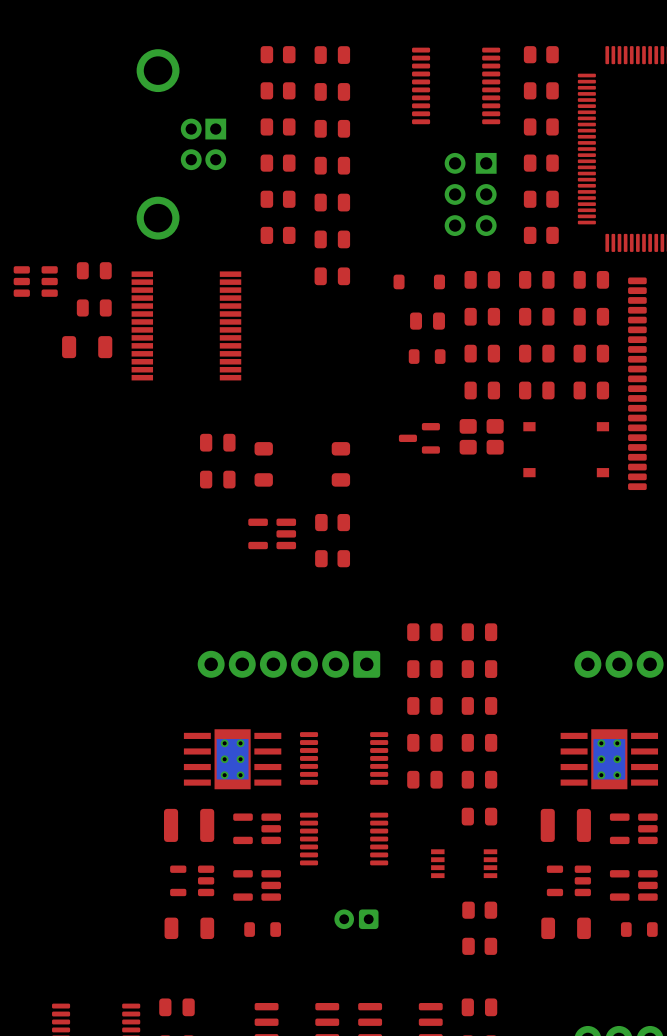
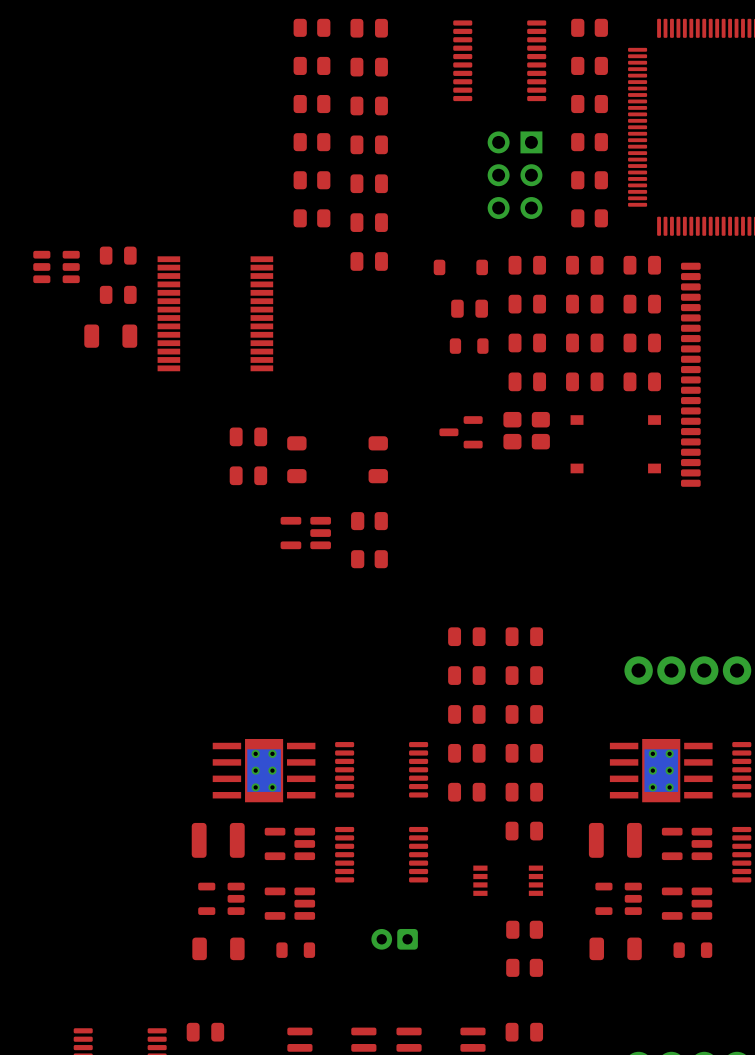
part: (181, 144) -> none
part: (288, 664) -> none

